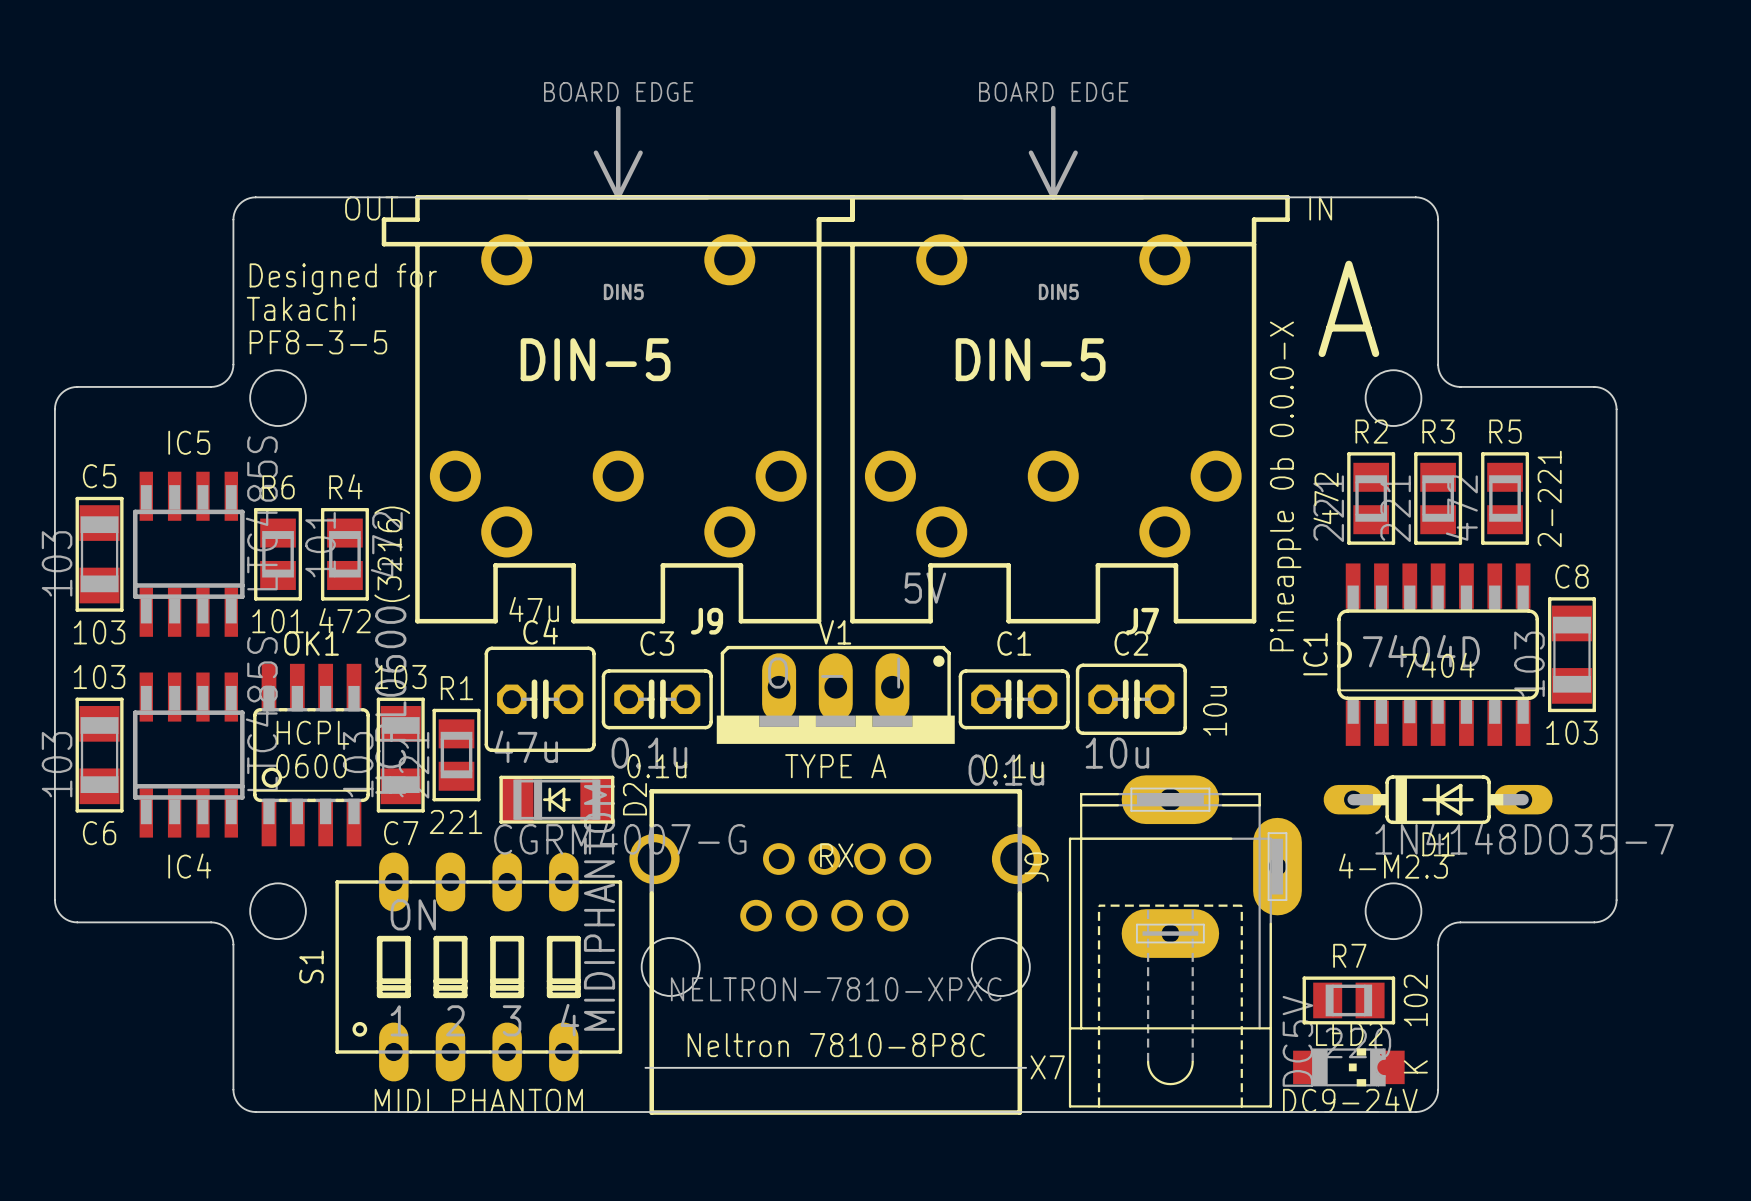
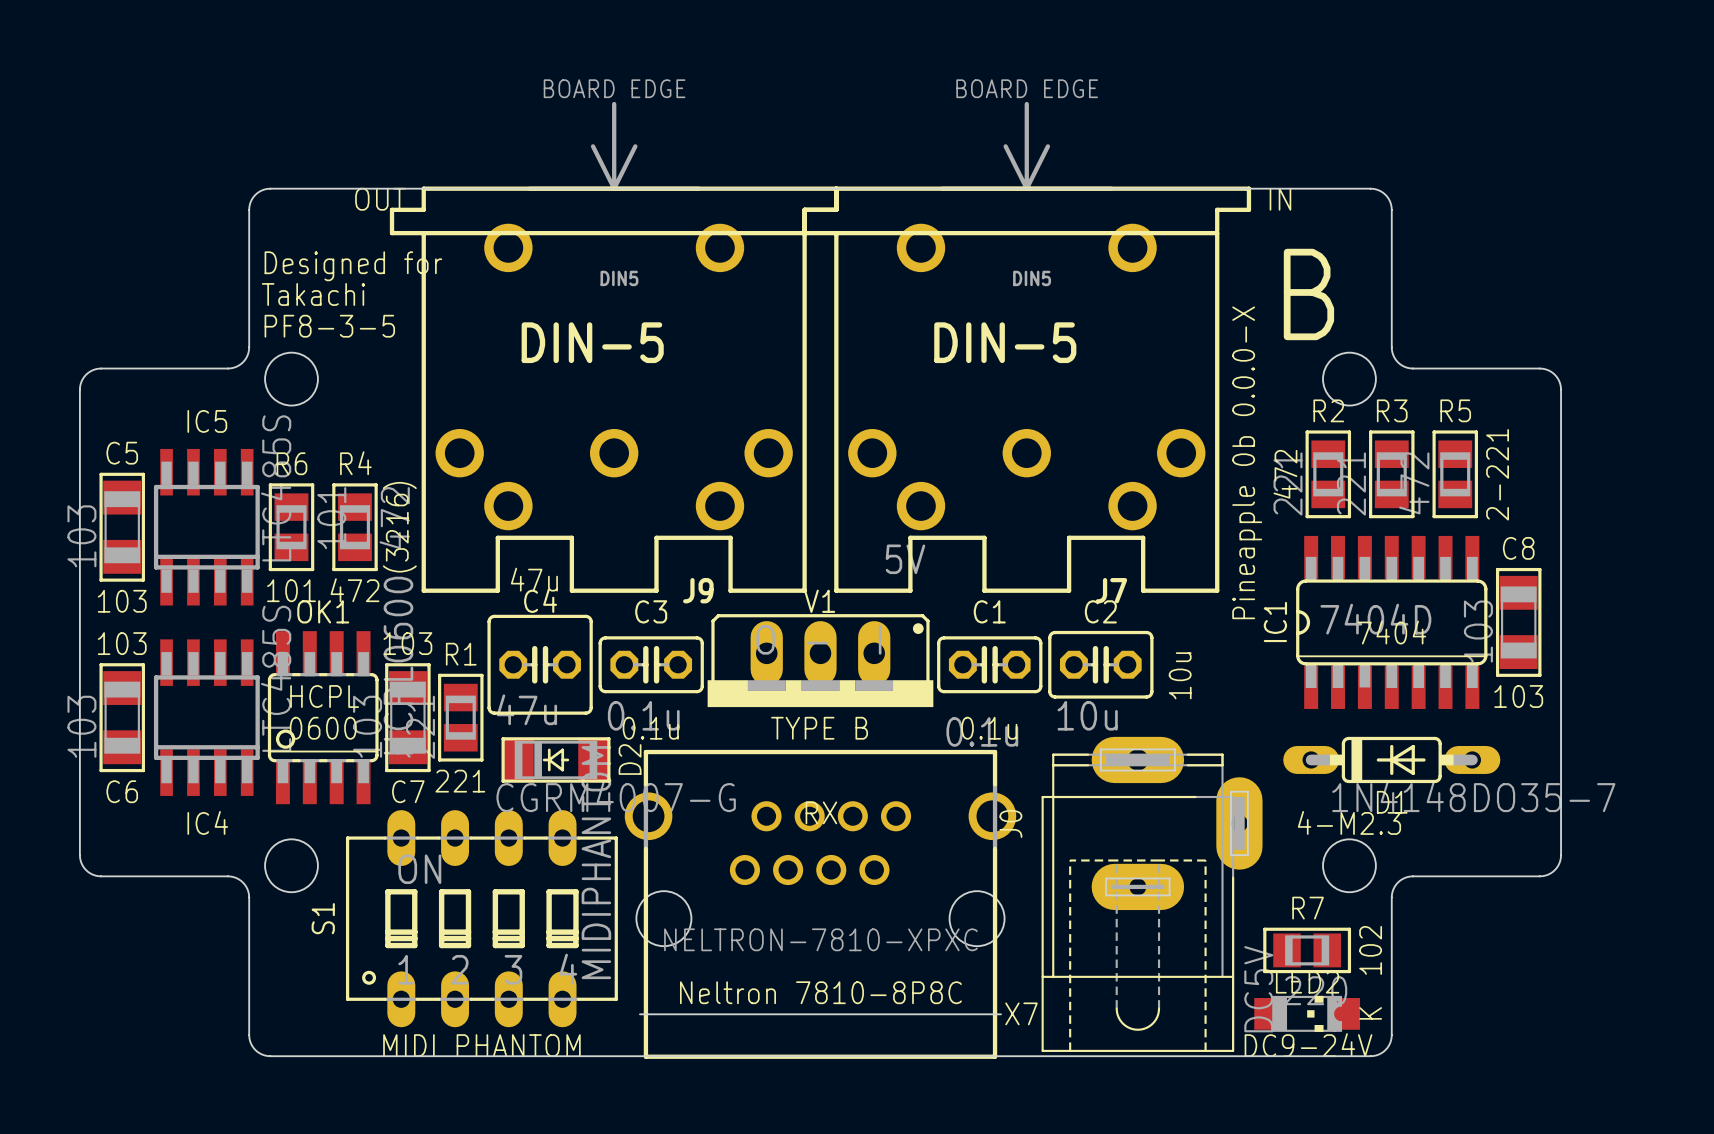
text: A (1348, 308) -> B (1308, 294)
text: TYPE A (835, 766) -> TYPE B (819, 728)

